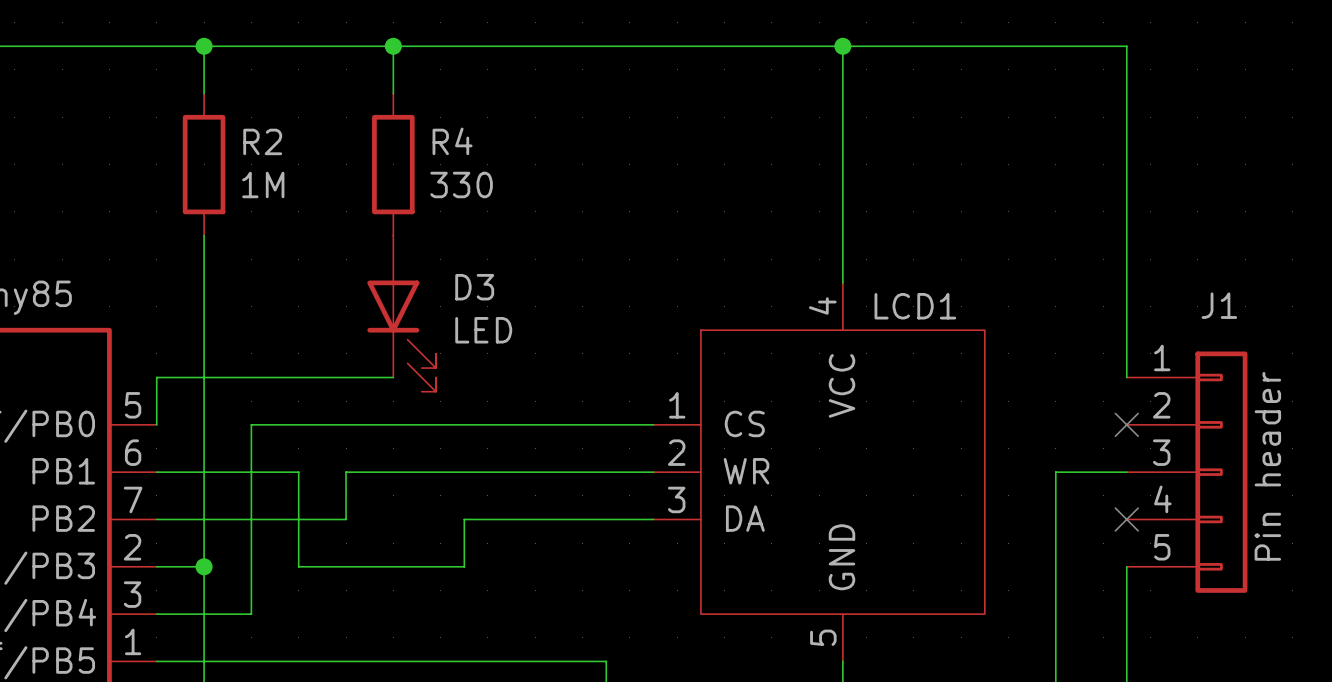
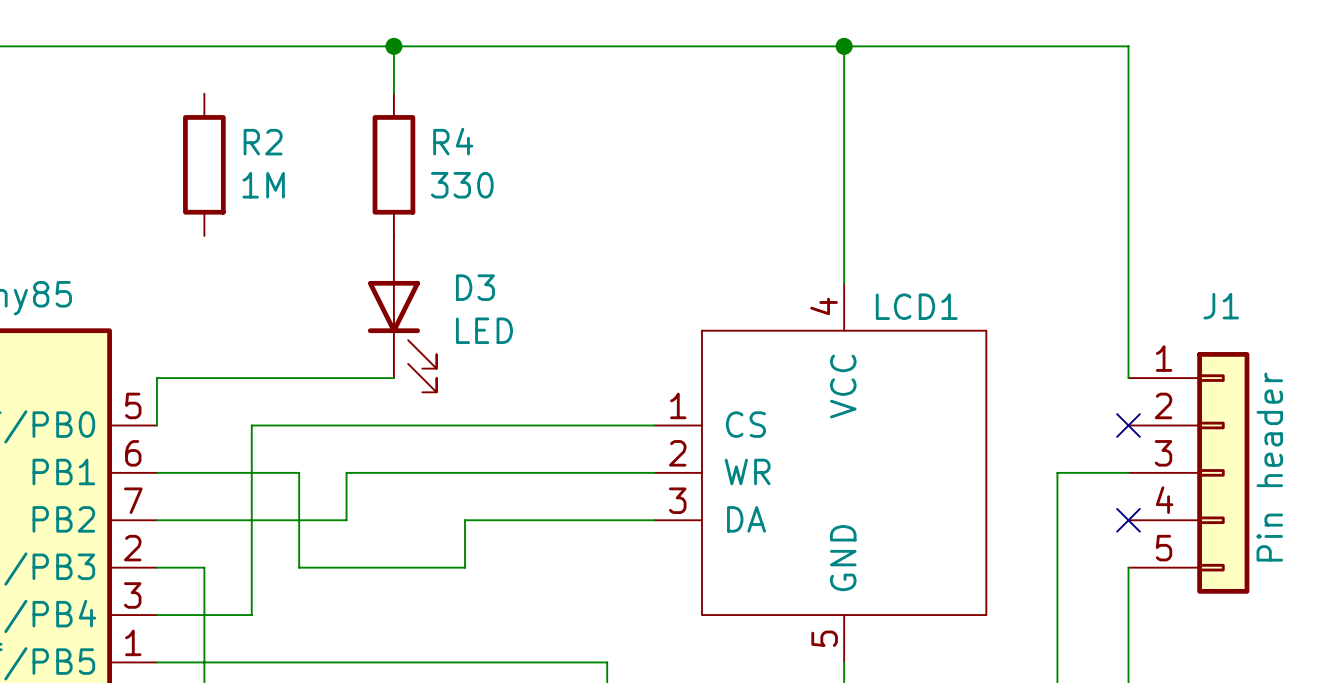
wire: (204, 46) (204, 93) -> none
junction: (204, 46) -> none
wire: (204, 235) (204, 566) -> none
junction: (204, 566) -> none

